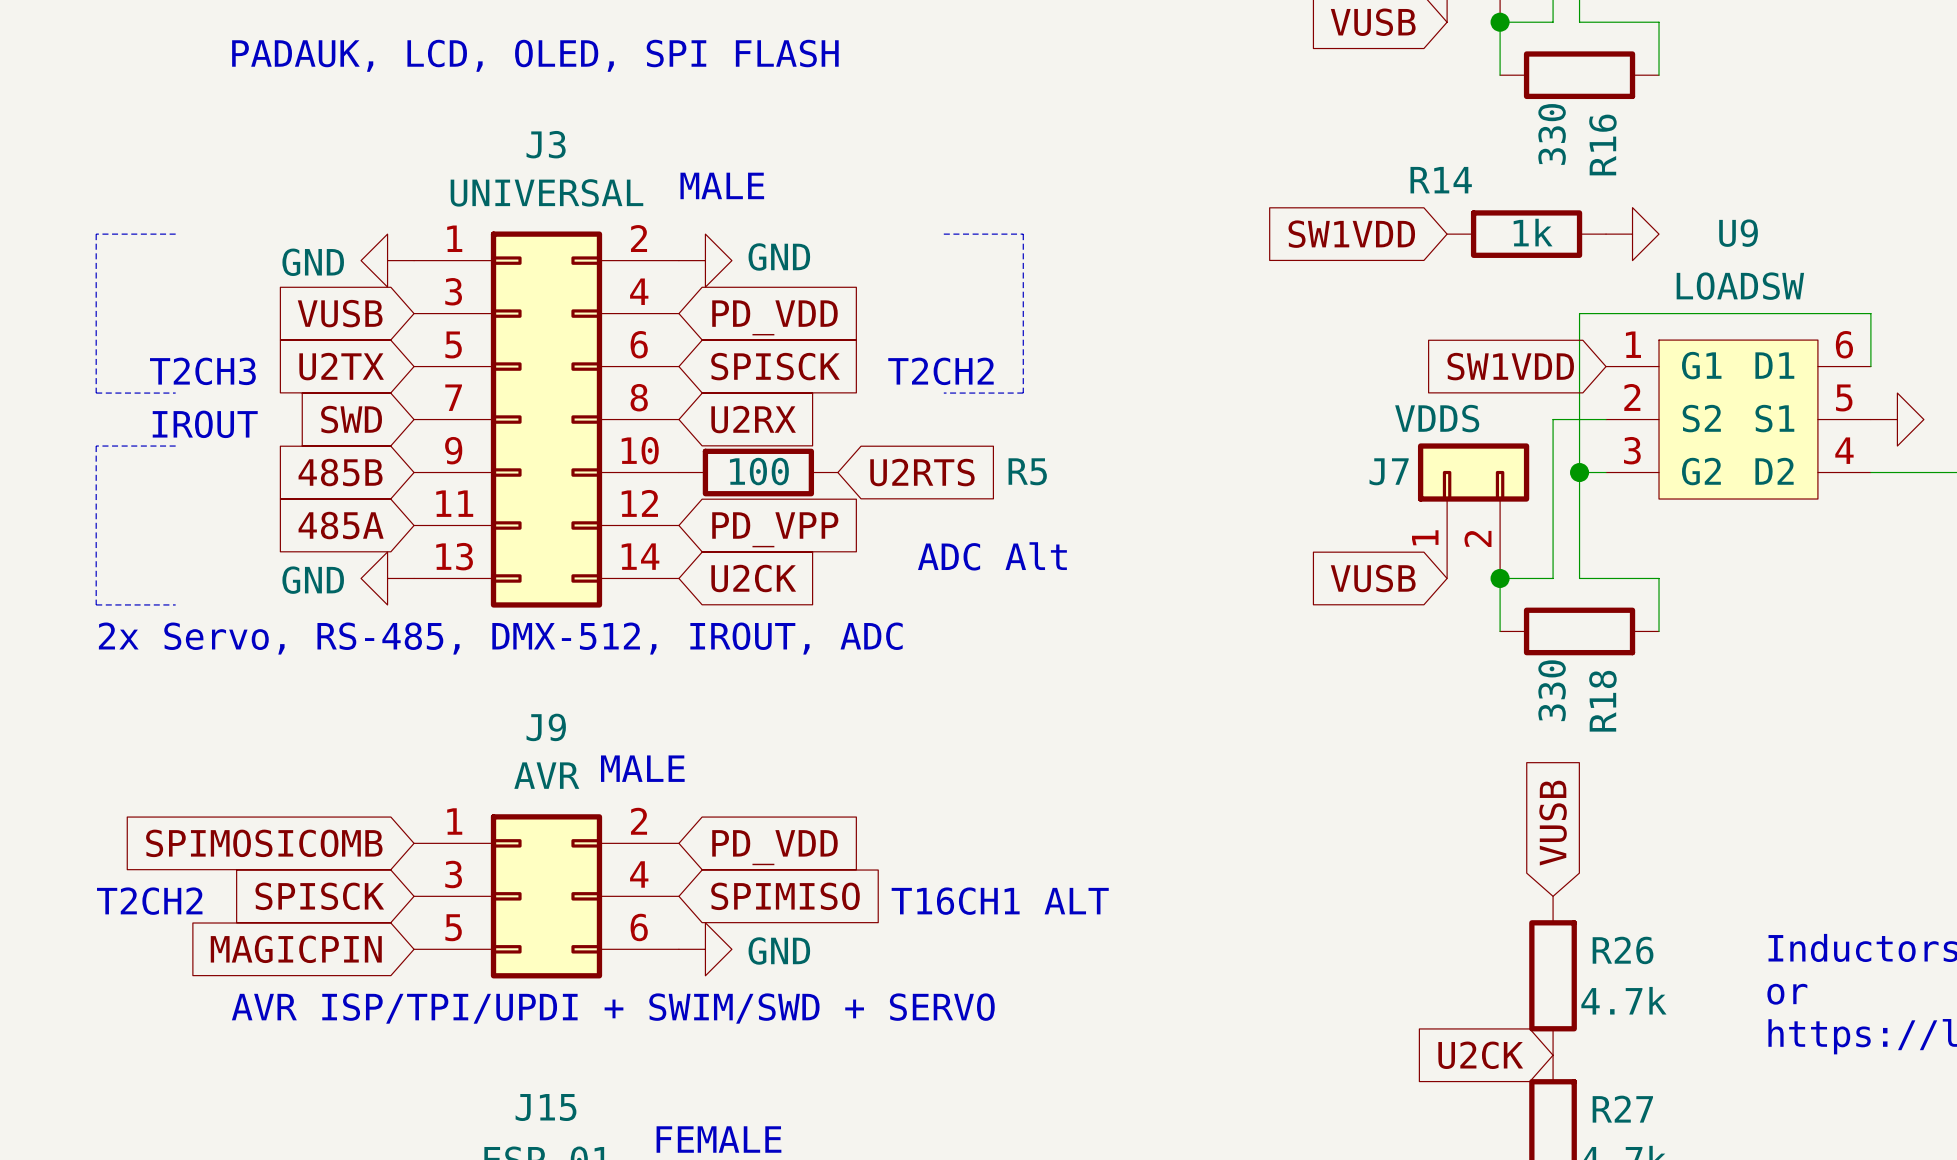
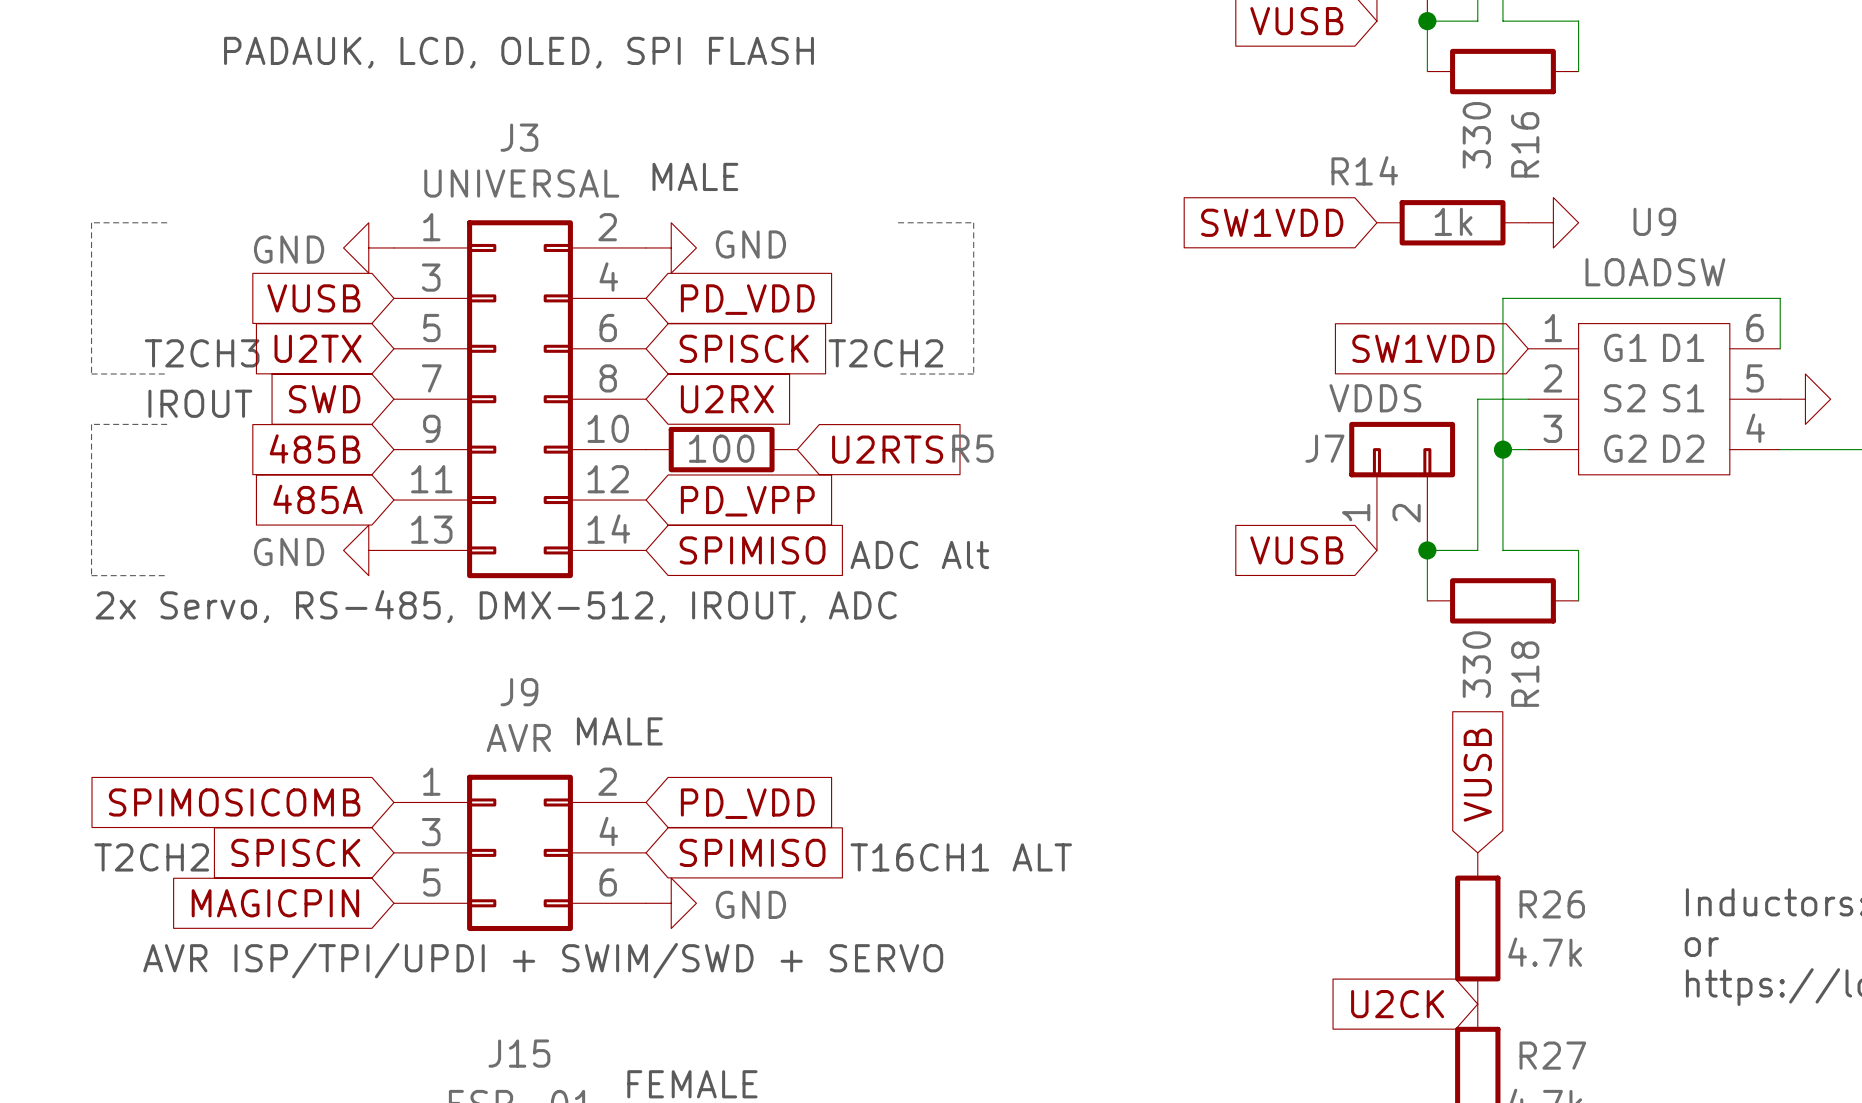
text position: ADC Alt (992, 556) -> ADC Alt (919, 554)
global label: U2CK (753, 578) -> SPIMISO (752, 550)

